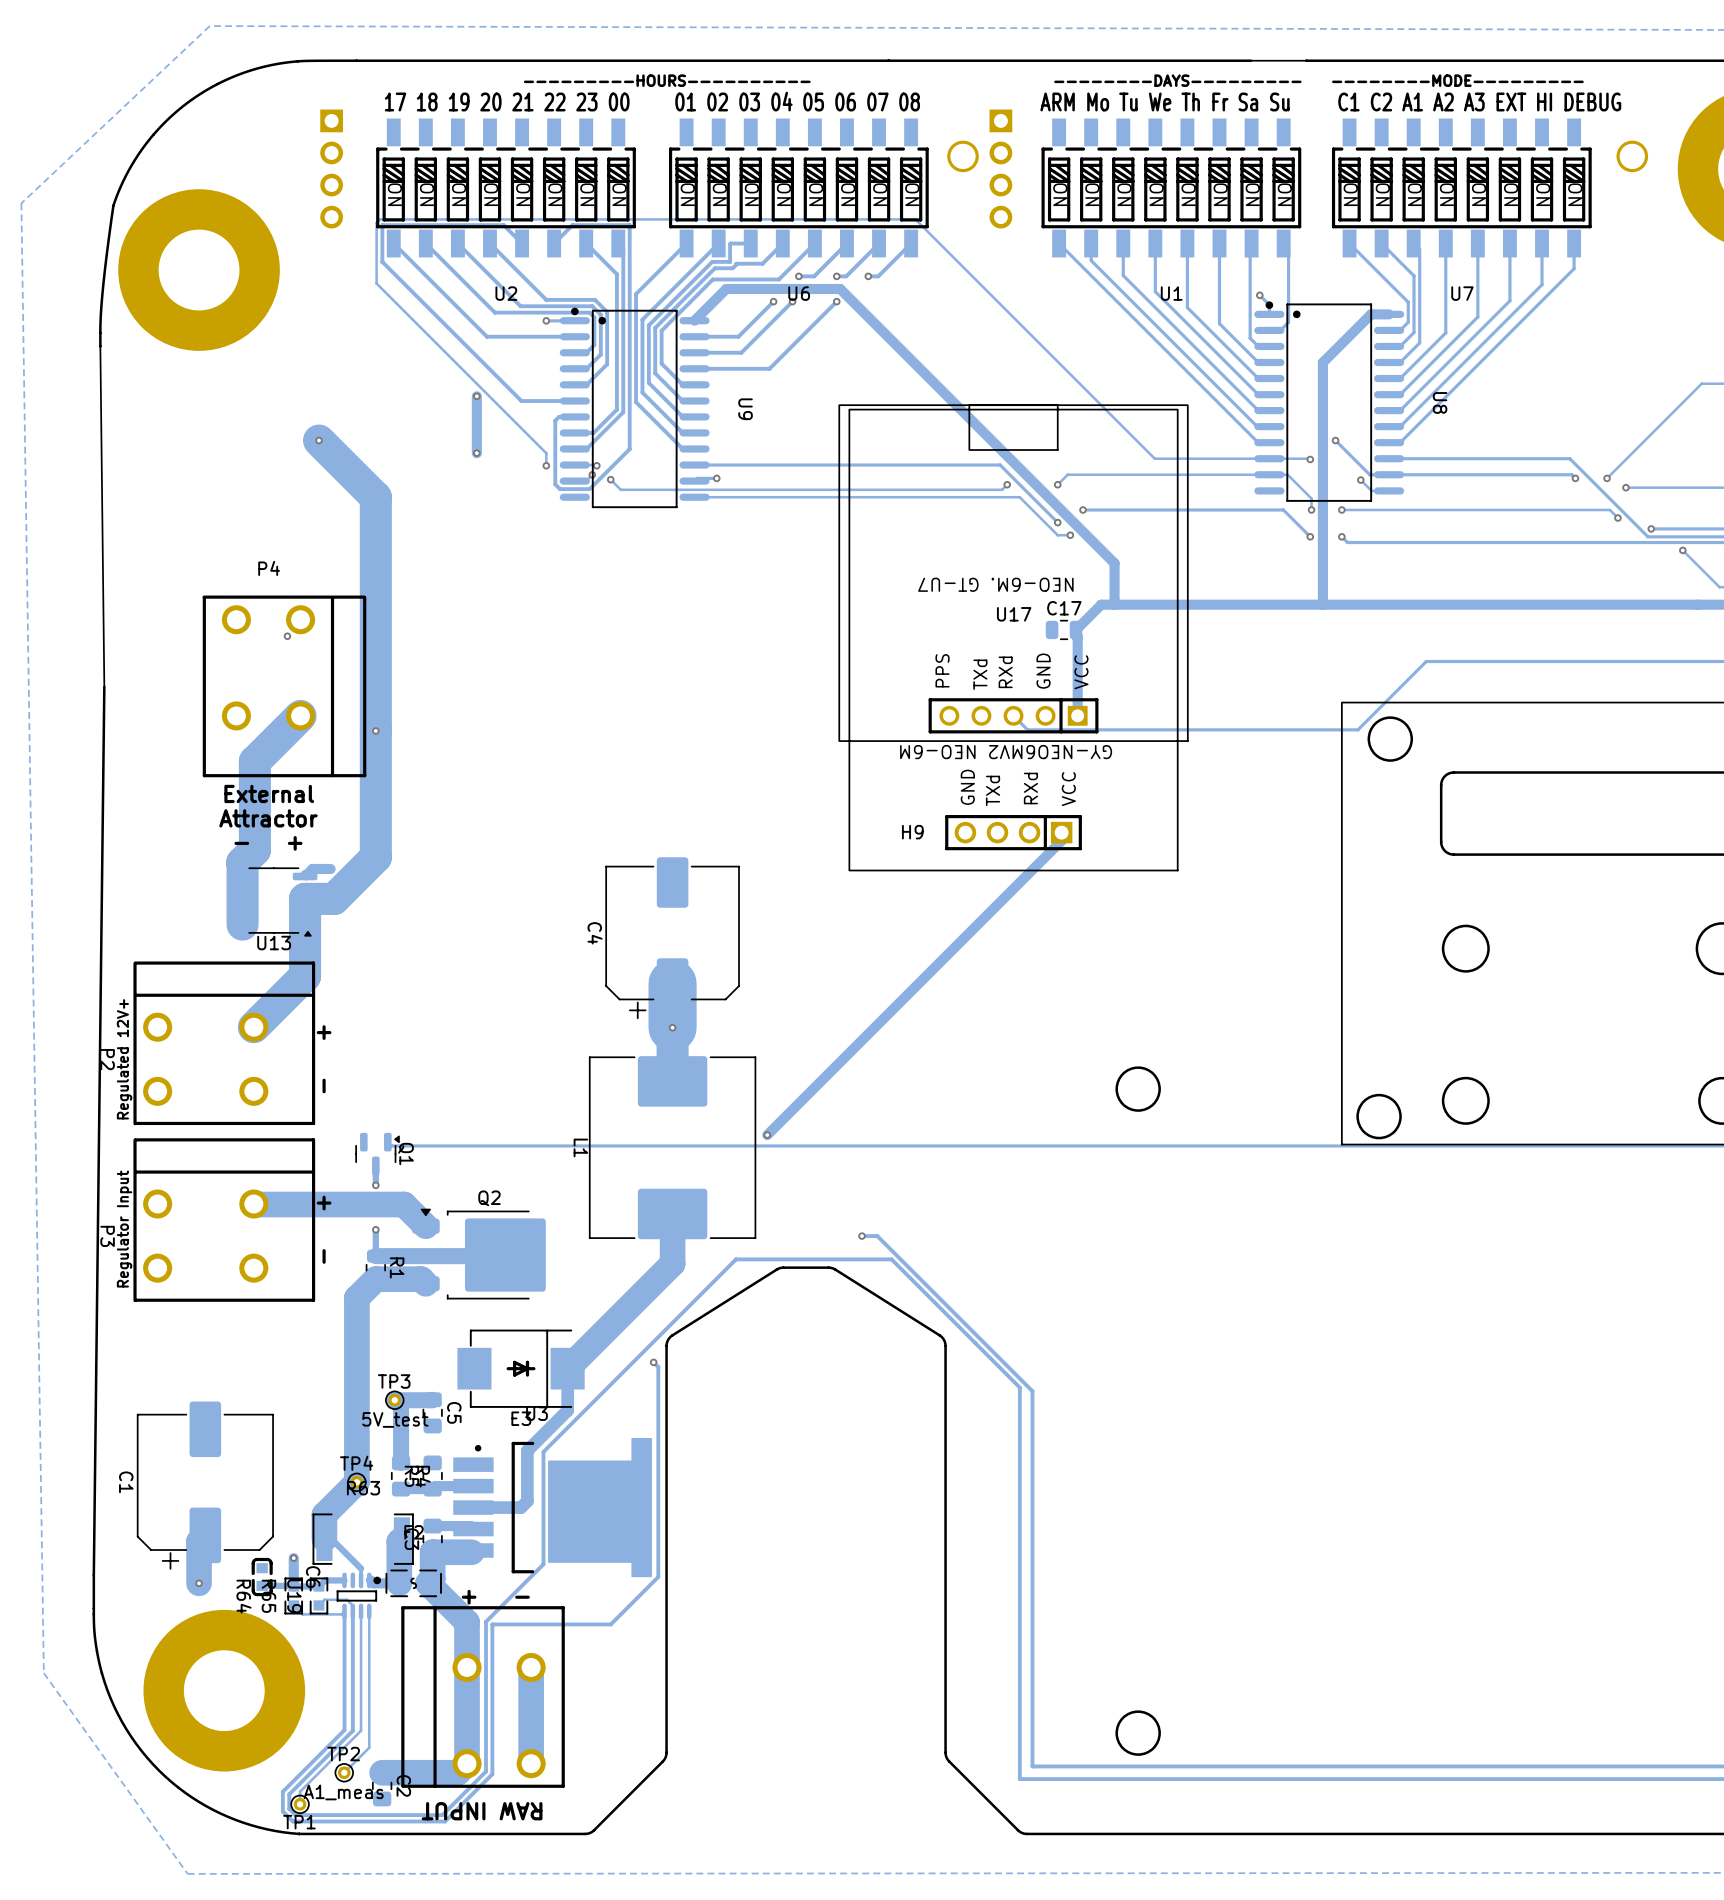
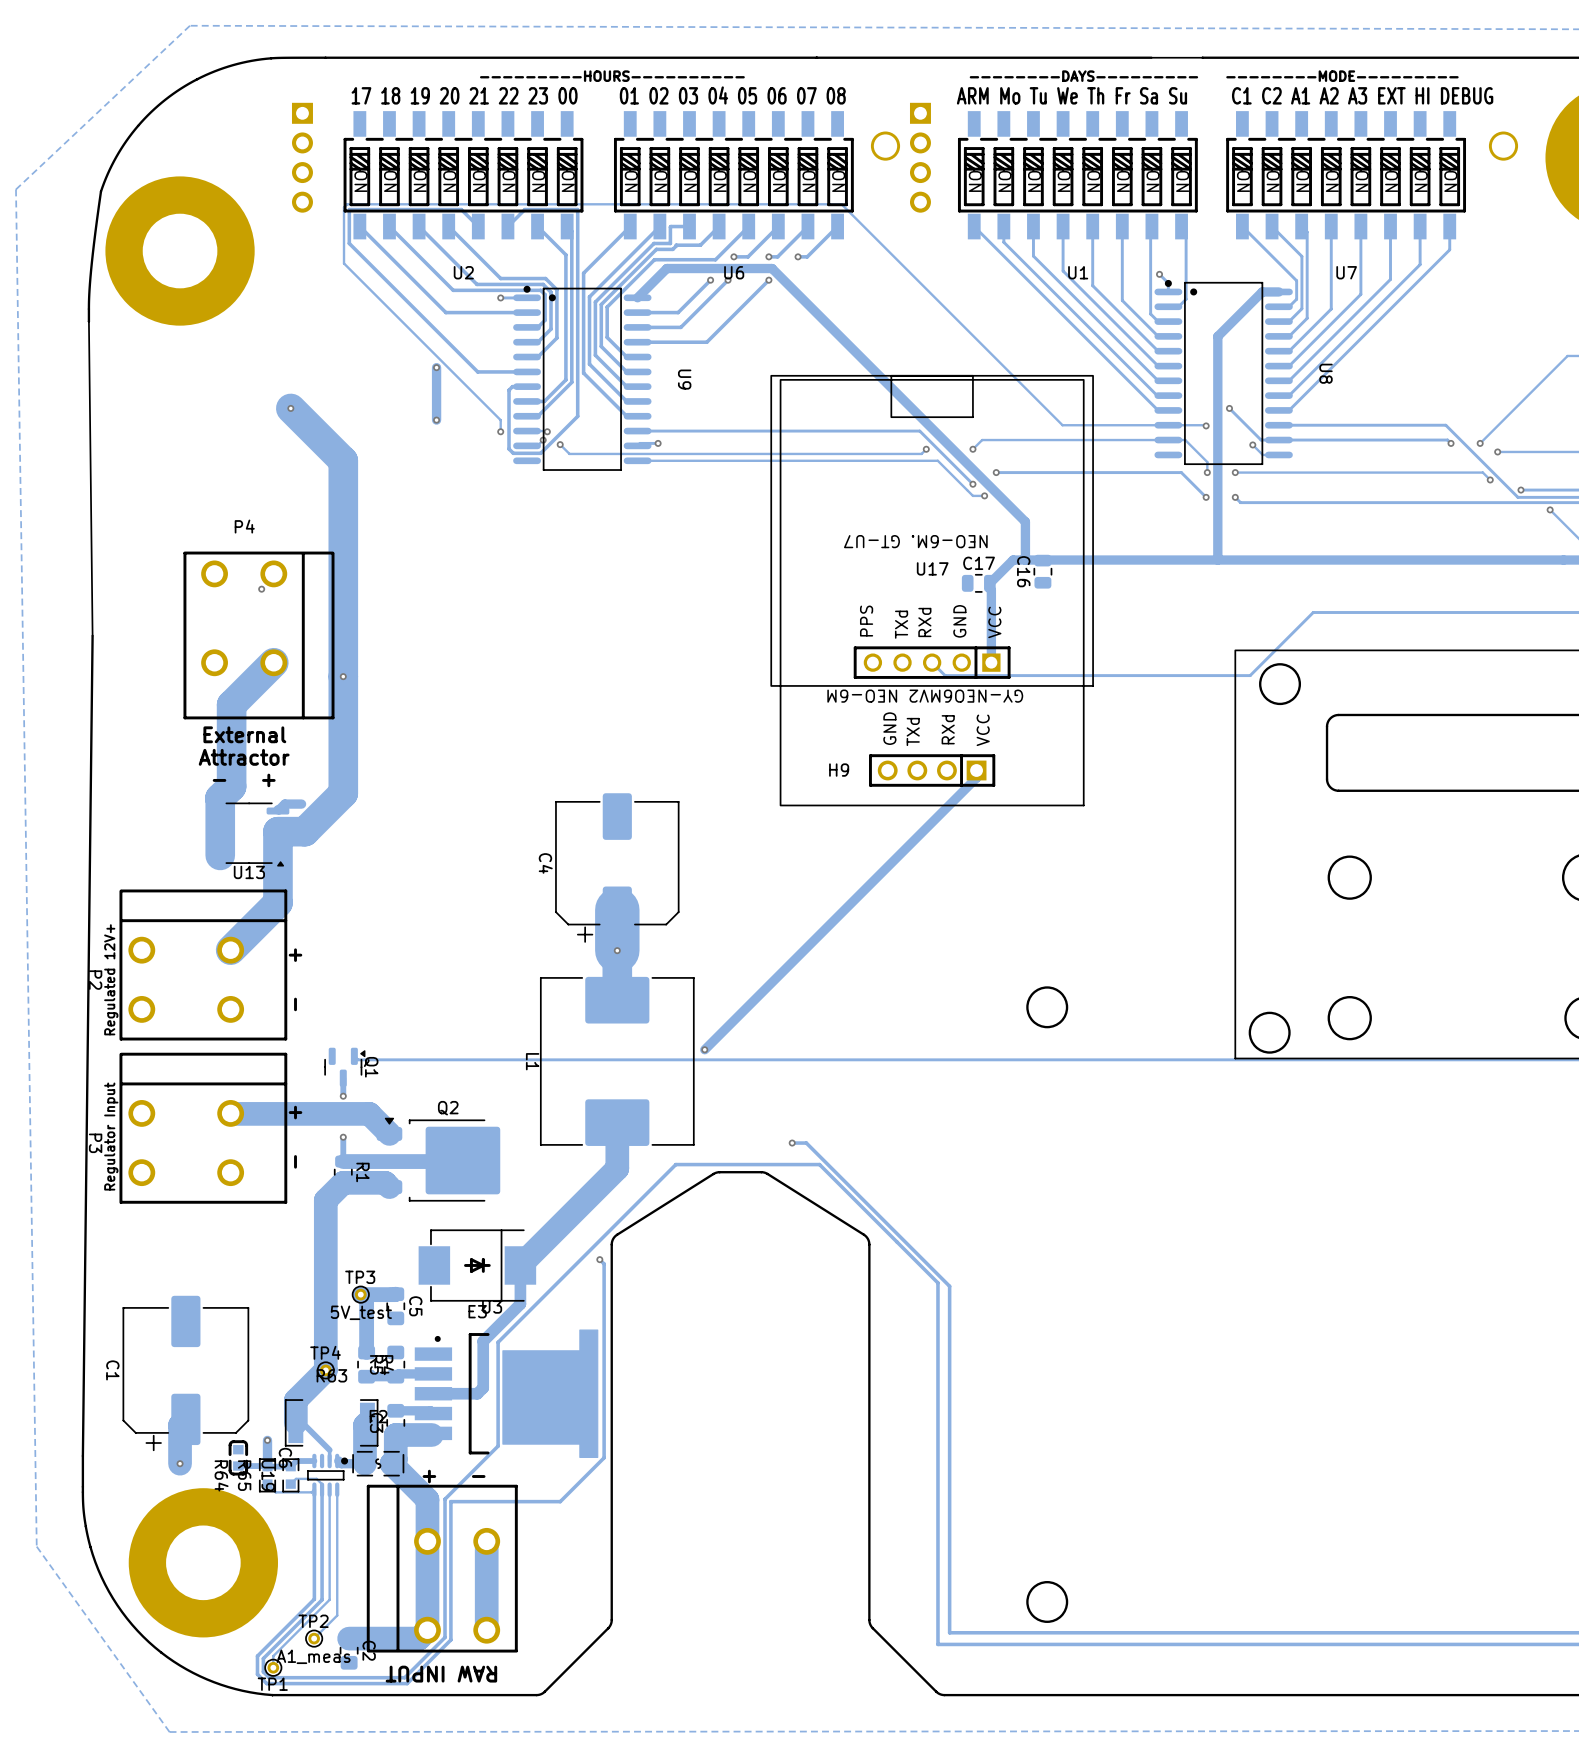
C16: none -> (1042, 571)

